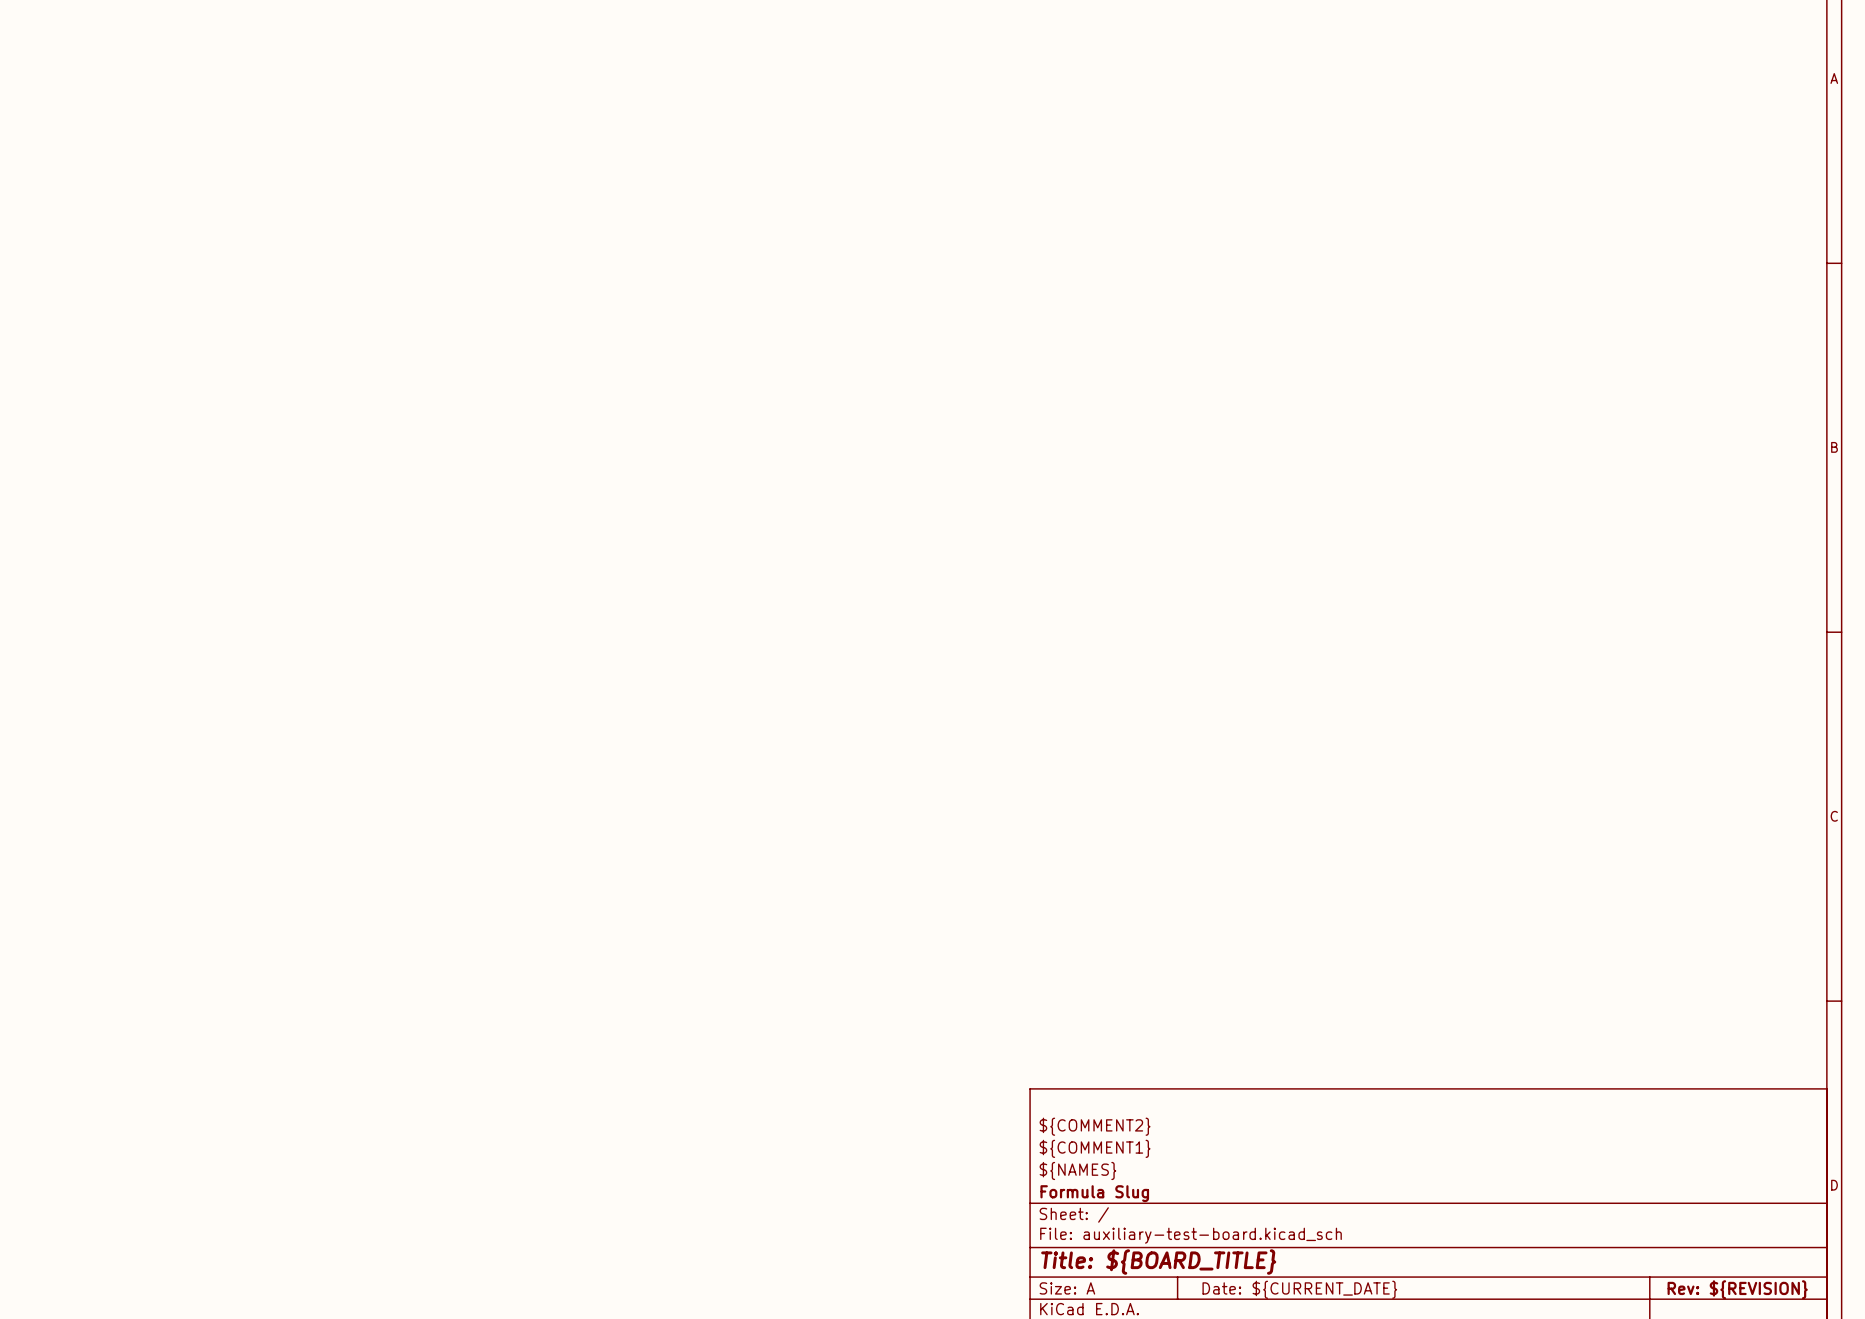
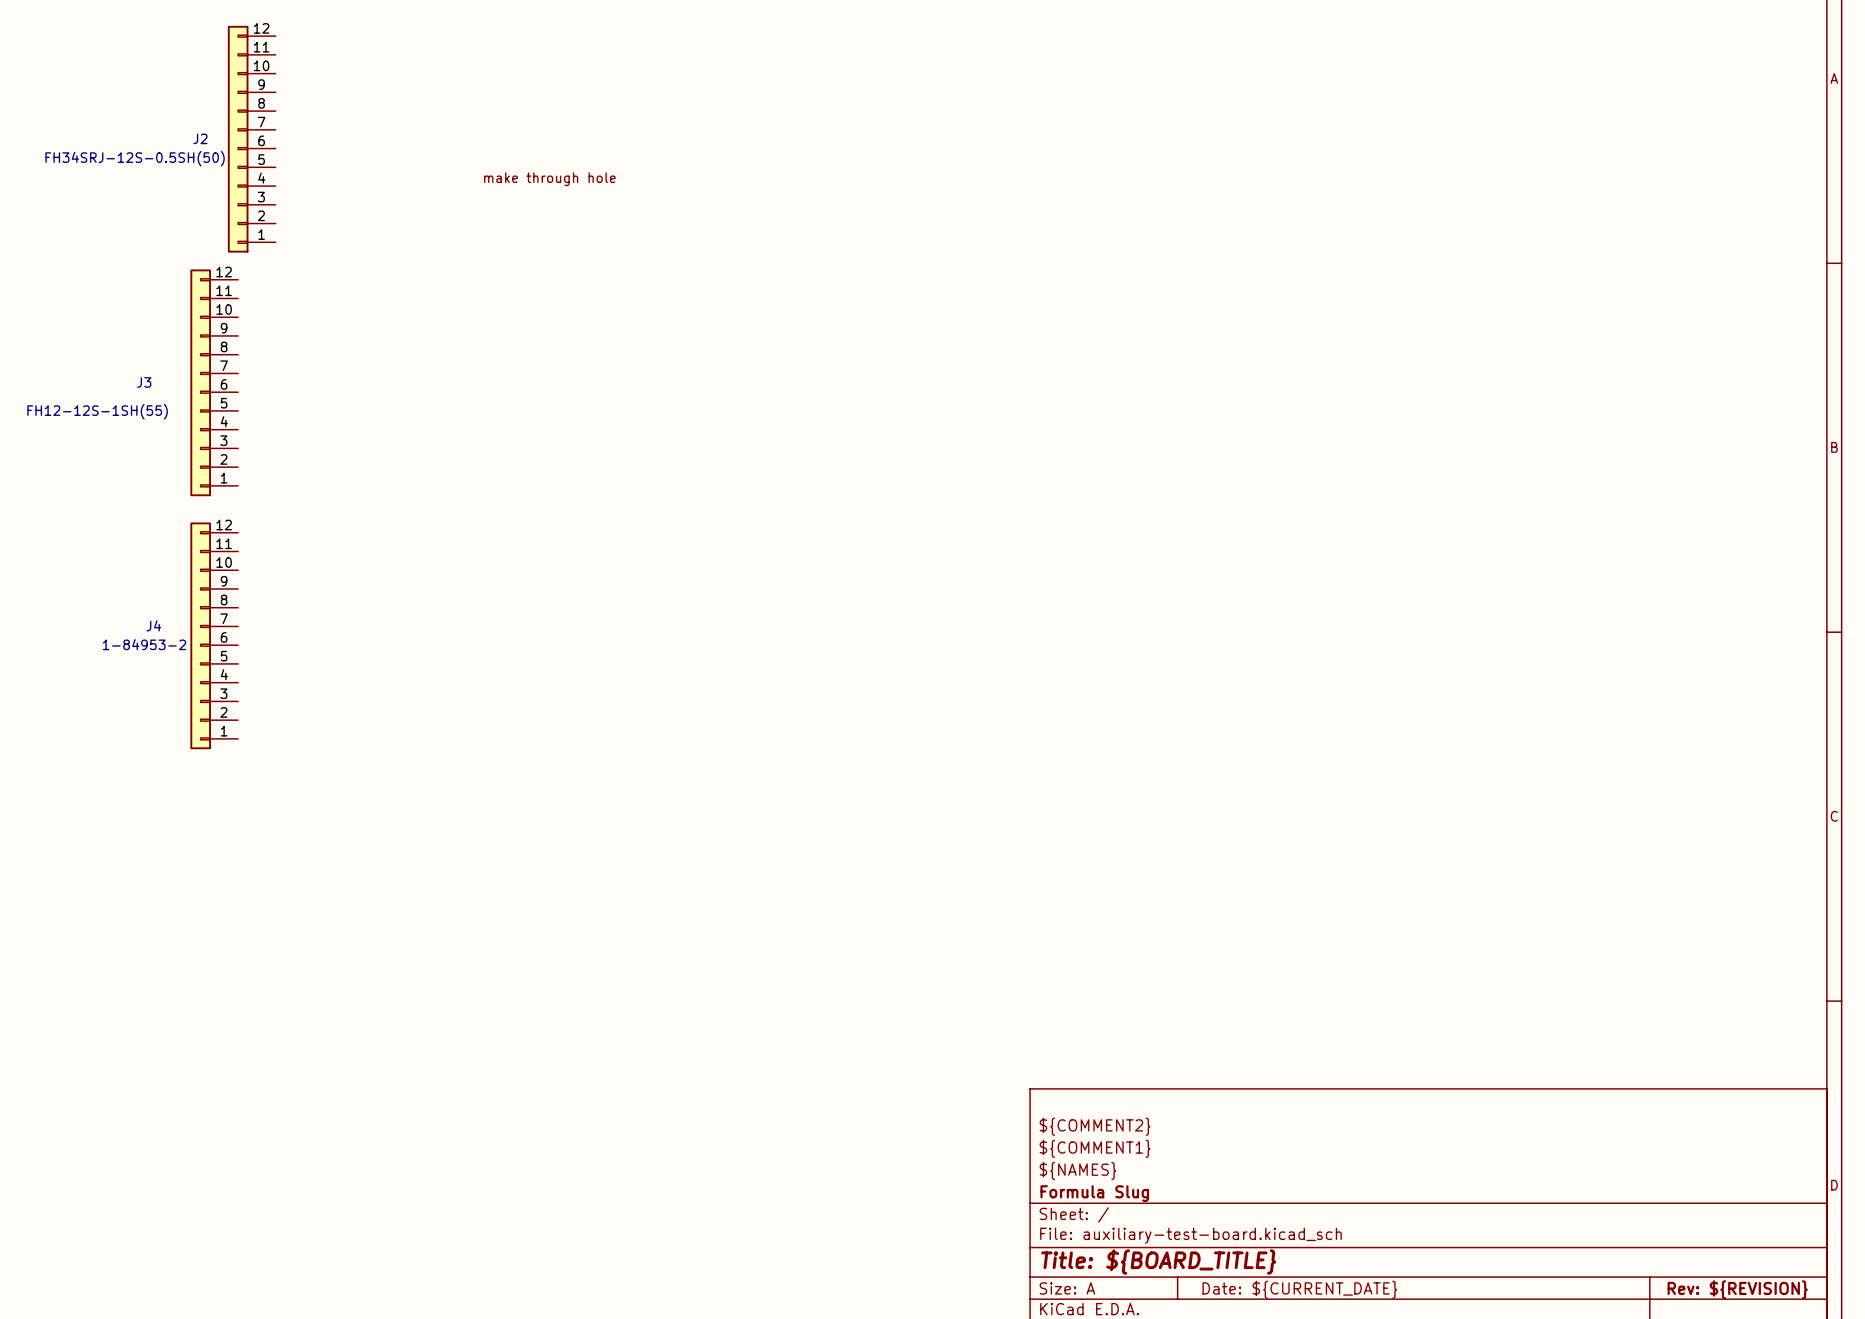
J2: none -> FH34SRJ-12S-0.5SH(50) (251, 139)
label: none -> make through hole (549, 179)
J3: none -> FH12-12S-1SH(55) (214, 382)
J4: none -> 1-84953-2 (214, 635)

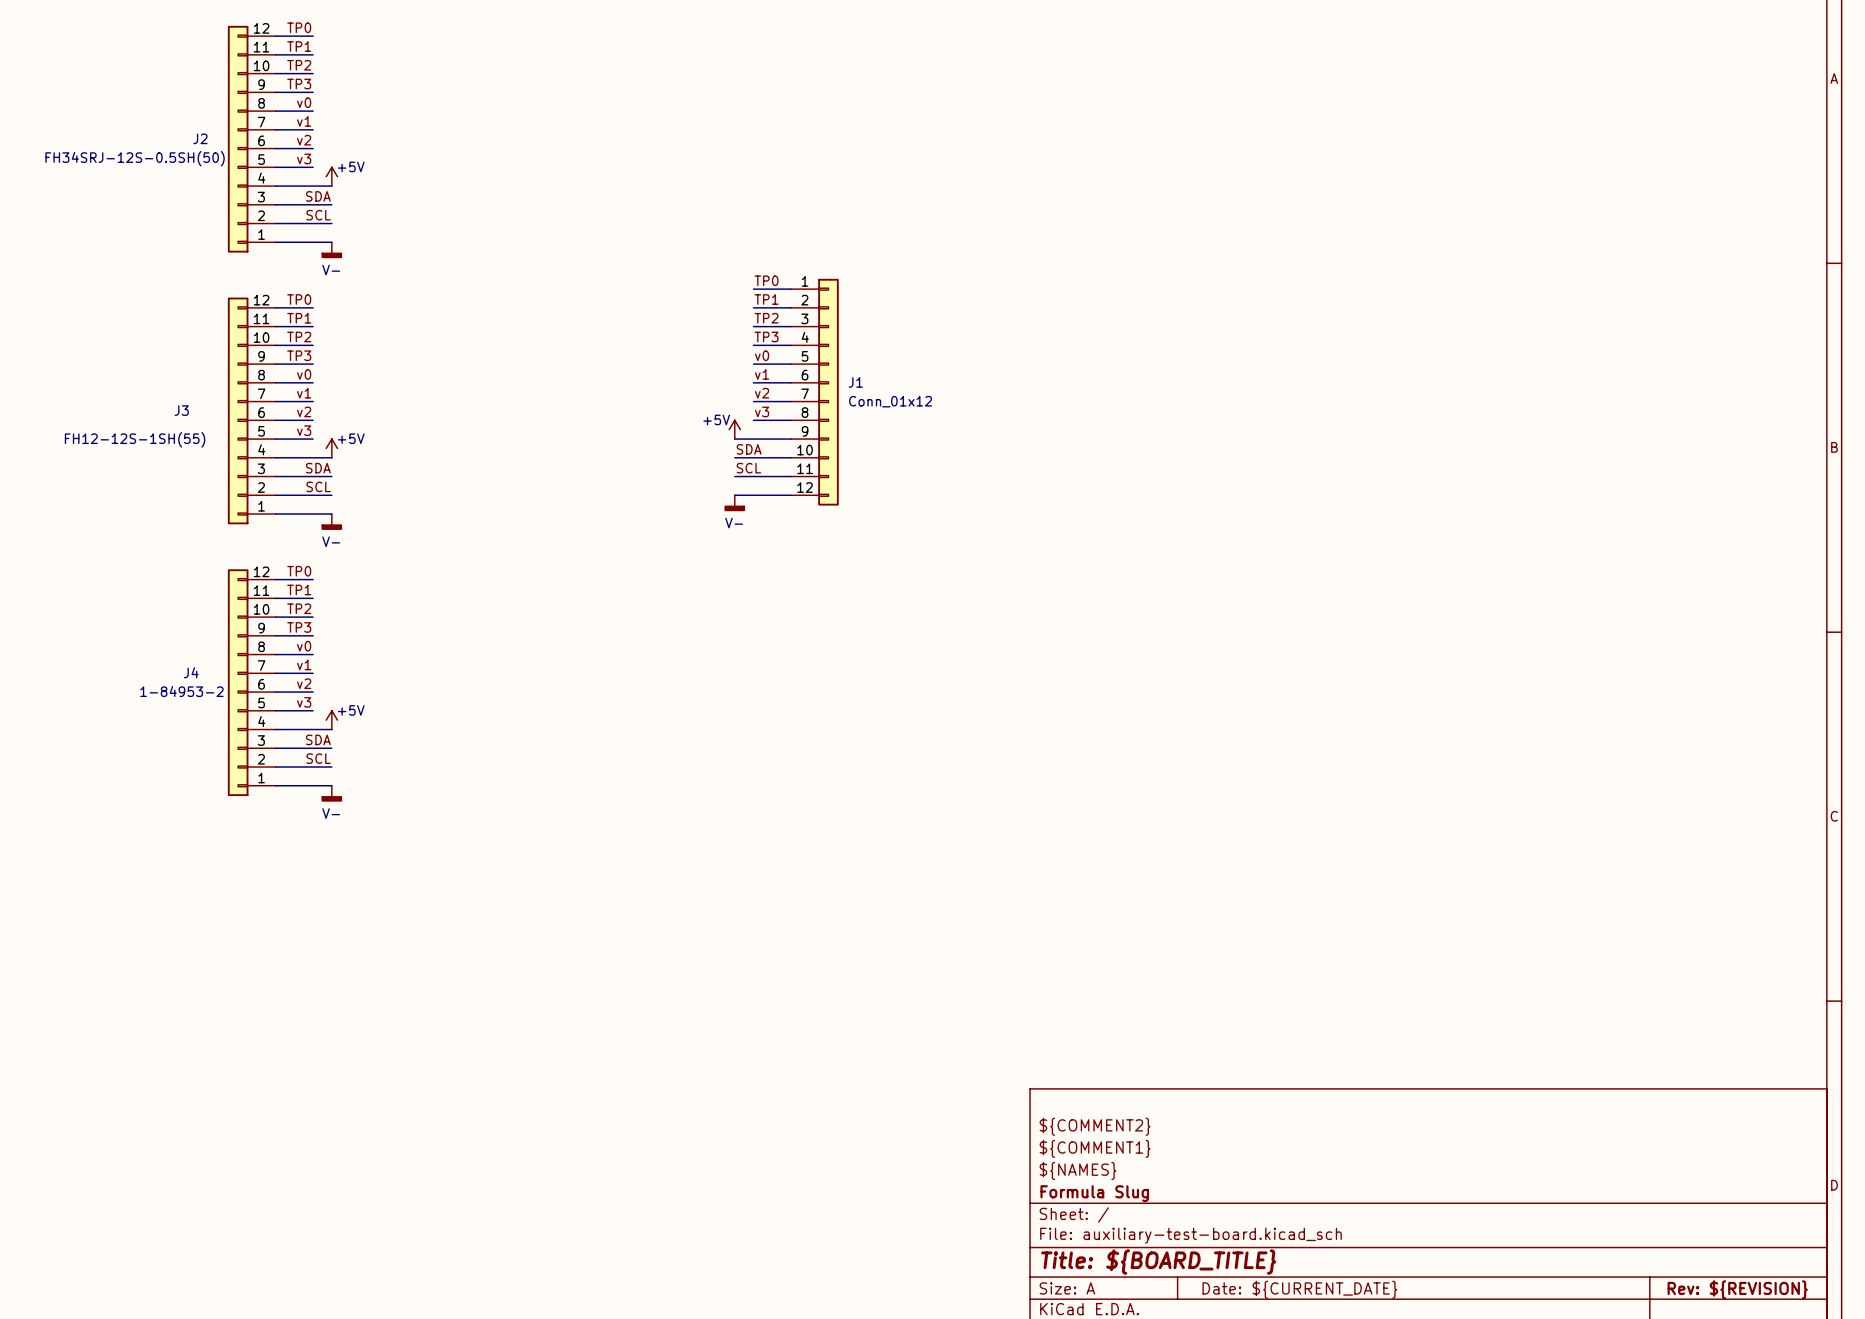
label: none -> TP0 (299, 27)
wire: none -> (275, 36) (313, 36)
label: none -> TP1 (299, 46)
wire: none -> (275, 54) (313, 54)
label: none -> TP2 (299, 65)
wire: none -> (275, 73) (313, 73)
label: none -> TP3 (299, 83)
wire: none -> (275, 92) (313, 92)
label: none -> v0 (304, 102)
wire: none -> (275, 111) (313, 111)
label: none -> v1 (304, 121)
wire: none -> (275, 129) (313, 129)
label: none -> v2 (304, 140)
wire: none -> (275, 148) (313, 148)
label: none -> v3 (304, 158)
wire: none -> (275, 167) (313, 167)
power symbol: none -> +5V (331, 176)
label: make through hole (549, 179) -> none
wire: none -> (275, 186) (331, 186)
label: none -> SDA (318, 196)
wire: none -> (275, 204) (331, 204)
label: none -> SCL (318, 215)
wire: none -> (275, 223) (331, 223)
wire: none -> (275, 242) (331, 242)
power symbol: none -> V- (331, 250)
label: none -> TP0 (766, 280)
wire: none -> (753, 289) (790, 289)
label: none -> TP0 (299, 299)
label: none -> TP1 (766, 299)
wire: none -> (275, 307) (313, 307)
wire: none -> (753, 307) (790, 307)
label: none -> TP1 (299, 318)
label: none -> TP2 (766, 318)
wire: none -> (275, 326) (313, 326)
wire: none -> (753, 326) (790, 326)
label: none -> TP2 (299, 336)
label: none -> TP3 (766, 336)
wire: none -> (275, 345) (313, 345)
wire: none -> (753, 345) (790, 345)
label: none -> TP3 (299, 355)
label: none -> v0 (762, 355)
wire: none -> (275, 364) (313, 364)
wire: none -> (753, 364) (790, 364)
label: none -> v0 (304, 374)
label: none -> v1 (762, 374)
J3 position: (214, 382) -> (251, 410)
wire: none -> (275, 382) (313, 382)
wire: none -> (753, 382) (790, 382)
J1: none -> Conn_01x12 (814, 392)
label: none -> v1 (304, 393)
label: none -> v2 (762, 393)
wire: none -> (275, 401) (313, 401)
wire: none -> (753, 401) (790, 401)
label: none -> v2 (304, 411)
label: none -> v3 (762, 411)
wire: none -> (275, 420) (313, 420)
wire: none -> (753, 420) (790, 420)
power symbol: none -> +5V (734, 429)
label: none -> v3 (304, 430)
wire: none -> (275, 439) (313, 439)
wire: none -> (734, 439) (790, 439)
power symbol: none -> +5V (331, 448)
label: none -> SDA (749, 449)
wire: none -> (275, 457) (331, 457)
wire: none -> (734, 457) (790, 457)
label: none -> SDA (318, 468)
label: none -> SCL (748, 468)
wire: none -> (275, 476) (331, 476)
wire: none -> (734, 476) (790, 476)
label: none -> SCL (318, 486)
wire: none -> (275, 495) (331, 495)
wire: none -> (734, 495) (790, 495)
power symbol: none -> V- (734, 503)
wire: none -> (275, 514) (331, 514)
power symbol: none -> V- (331, 521)
label: none -> TP0 (299, 571)
wire: none -> (275, 579) (313, 579)
label: none -> TP1 (299, 589)
wire: none -> (275, 598) (313, 598)
label: none -> TP2 (299, 608)
wire: none -> (275, 617) (313, 617)
label: none -> TP3 (299, 627)
J4 position: (214, 635) -> (251, 682)
wire: none -> (275, 635) (313, 635)
label: none -> v0 (304, 646)
wire: none -> (275, 654) (313, 654)
label: none -> v1 (304, 664)
wire: none -> (275, 673) (313, 673)
label: none -> v2 (304, 683)
wire: none -> (275, 692) (313, 692)
label: none -> v3 (304, 702)
wire: none -> (275, 710) (313, 710)
power symbol: none -> +5V (331, 720)
wire: none -> (275, 729) (331, 729)
label: none -> SDA (318, 739)
wire: none -> (275, 748) (331, 748)
label: none -> SCL (318, 758)
wire: none -> (275, 767) (331, 767)
wire: none -> (275, 785) (331, 785)
power symbol: none -> V- (331, 793)

